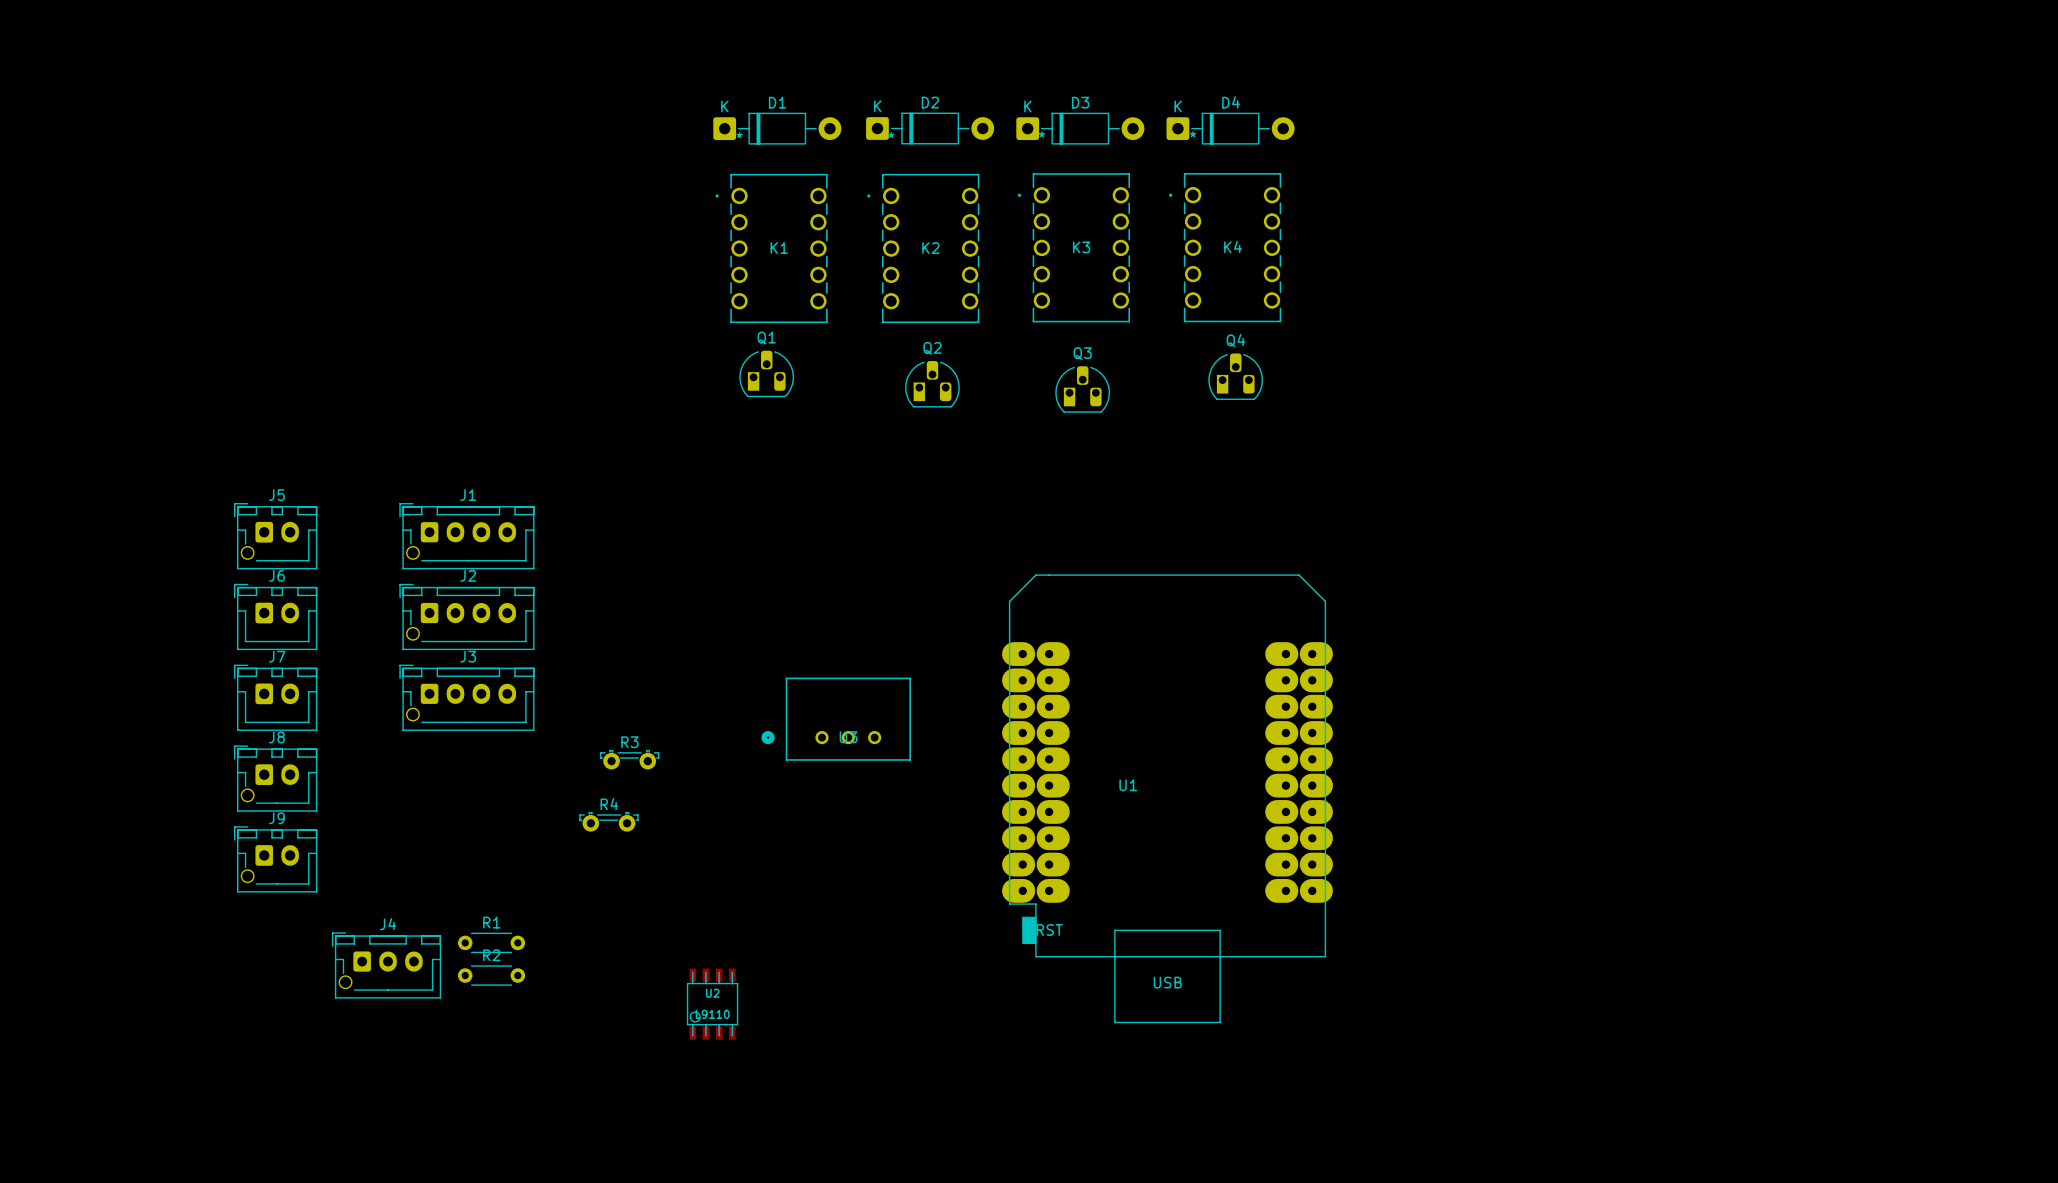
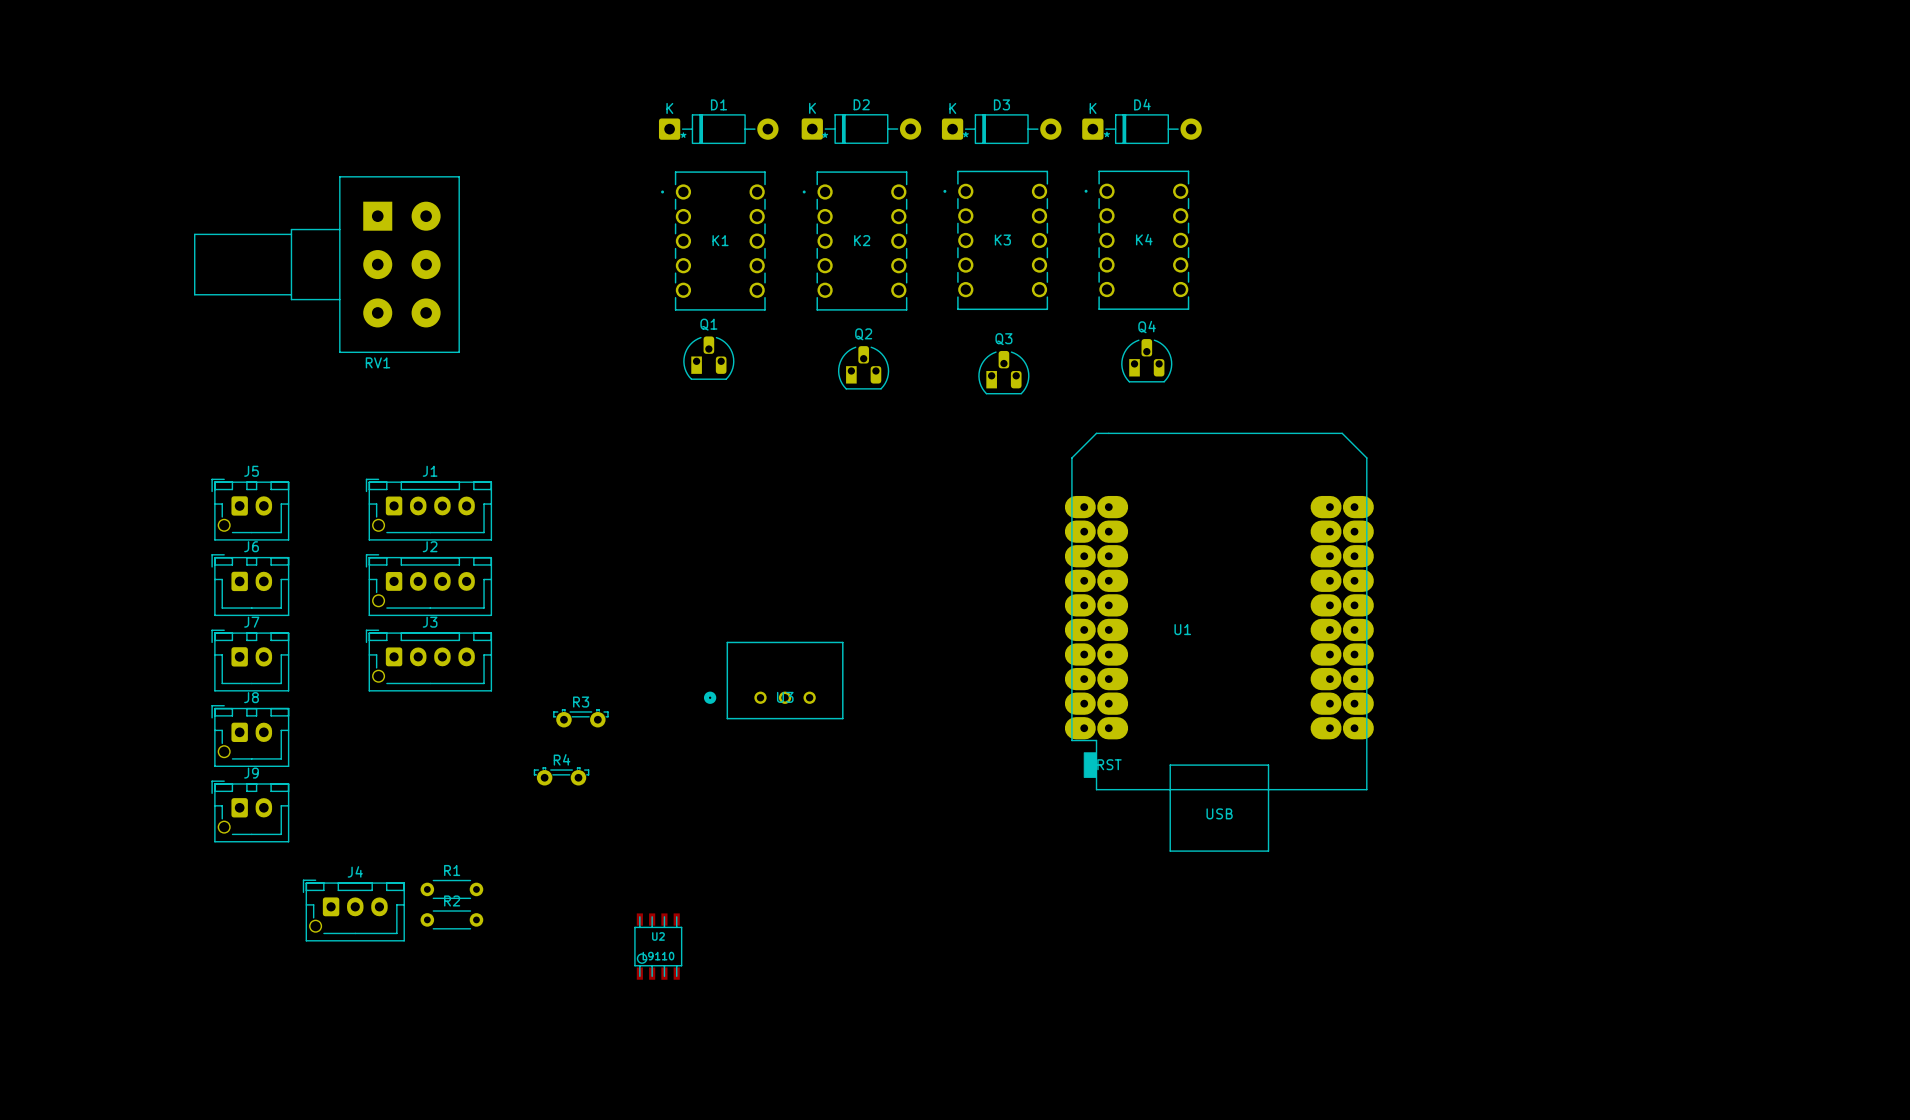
RV1: none -> (326, 264)
U1 position: (1167, 798) -> (1219, 642)

